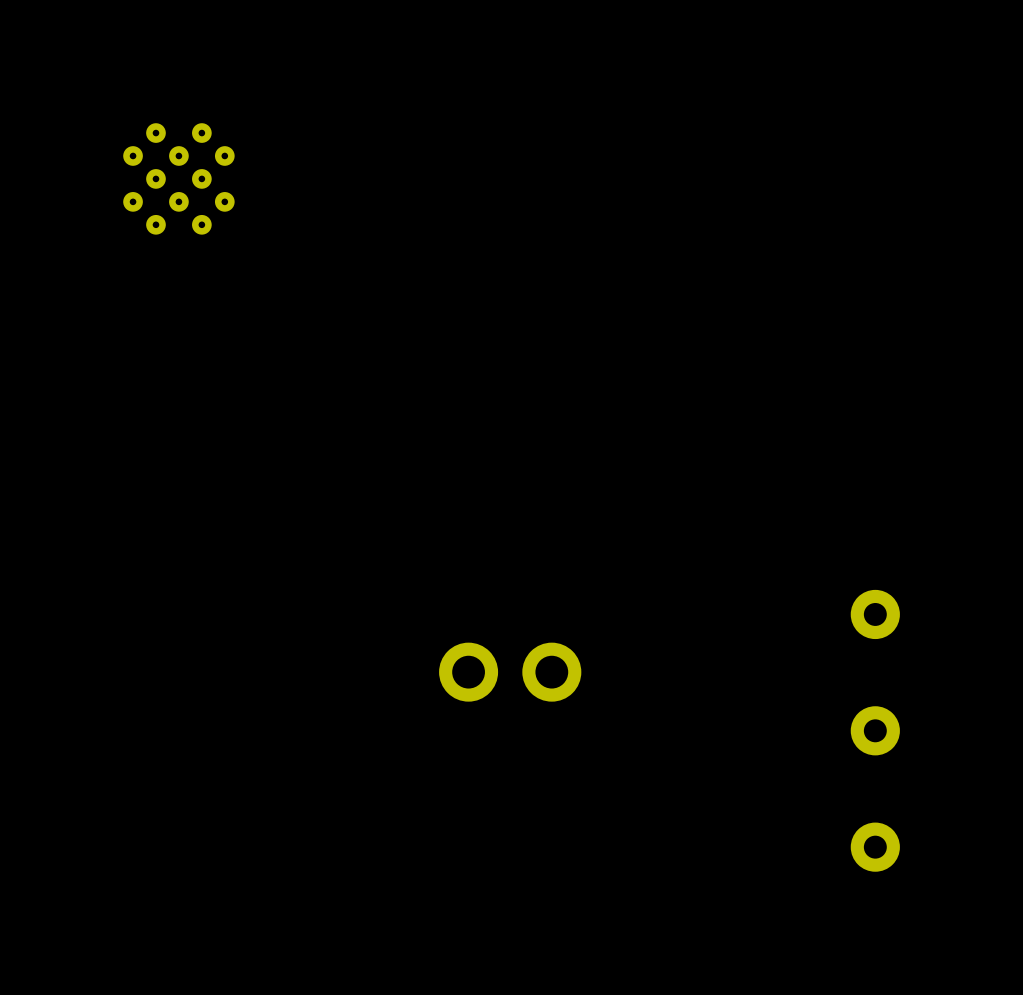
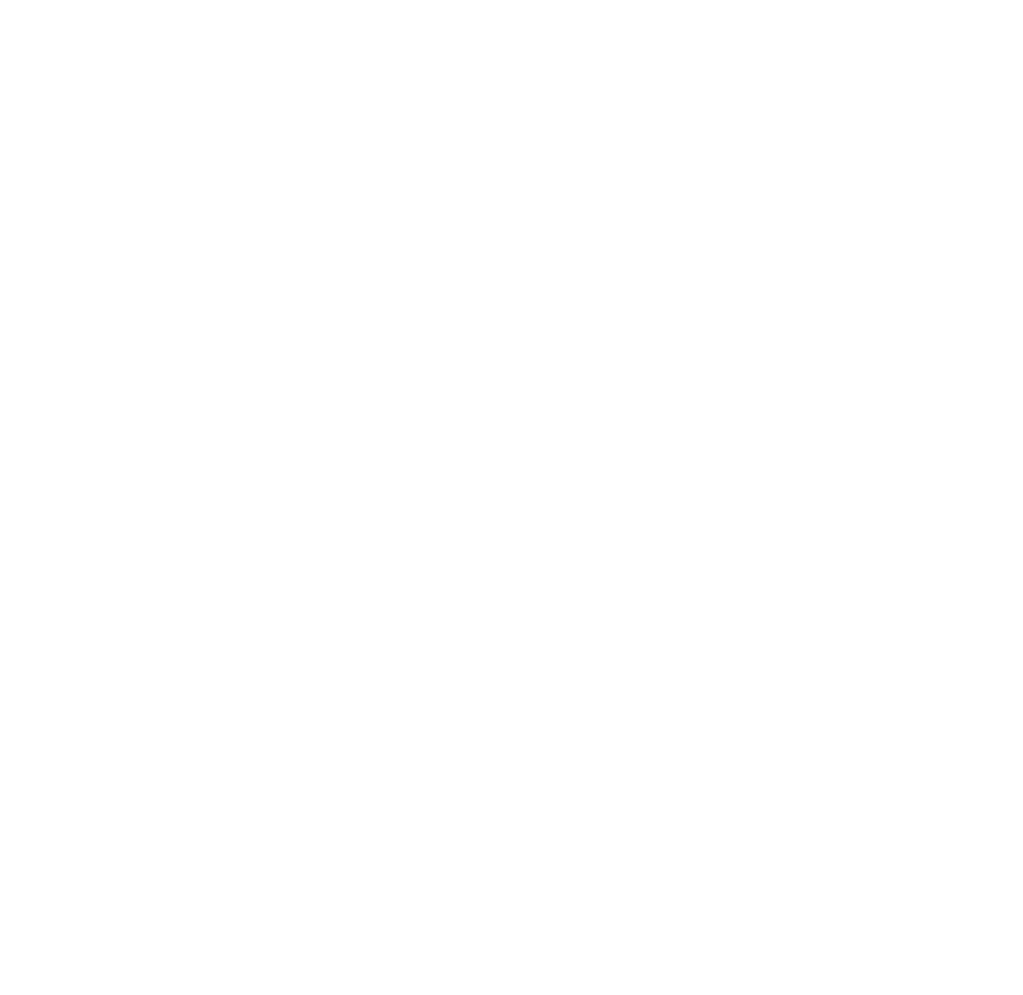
part: (178, 178) -> none
part: (875, 614) -> none
part: (510, 672) -> none
part: (875, 730) -> none
part: (875, 847) -> none

